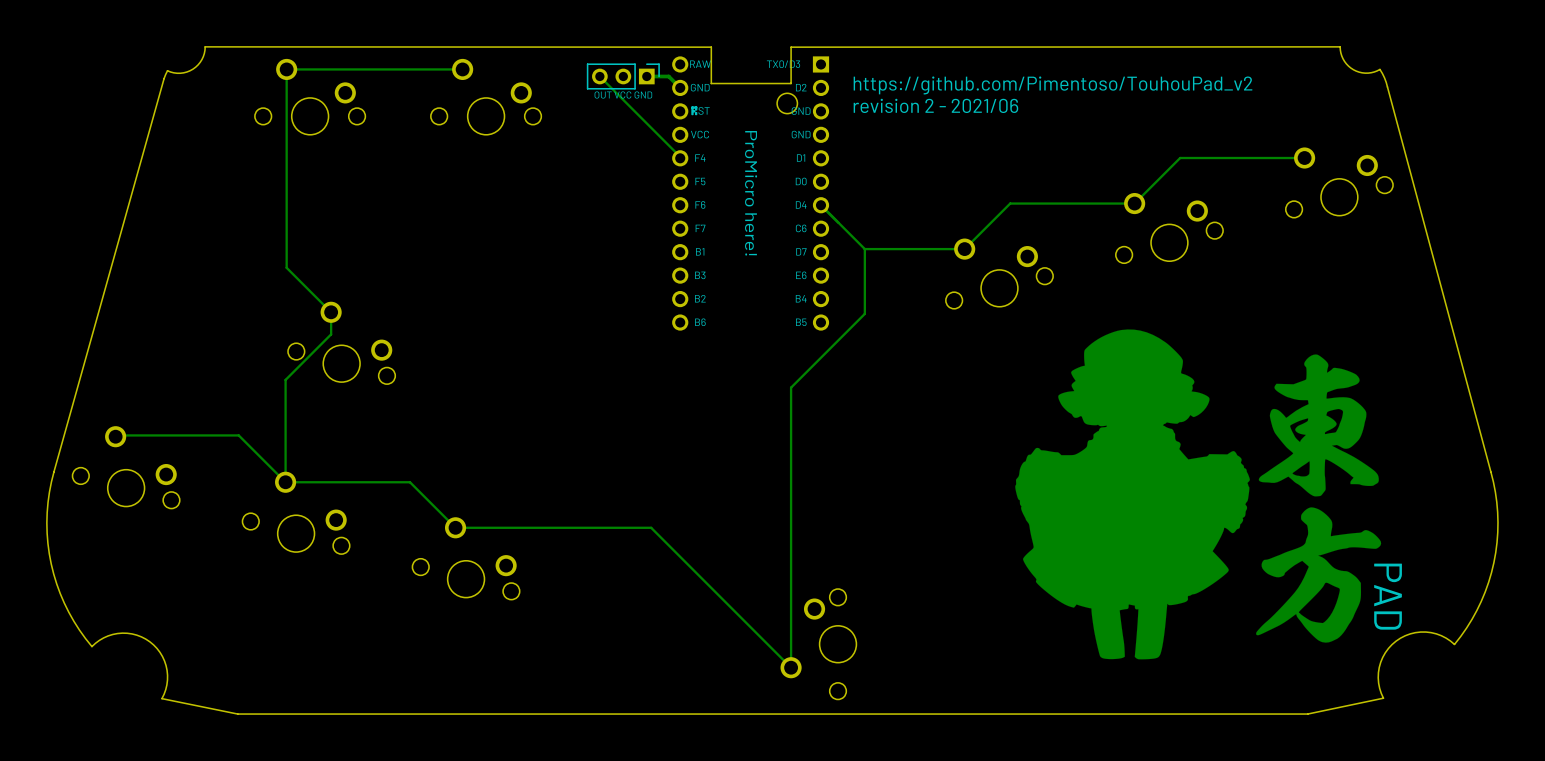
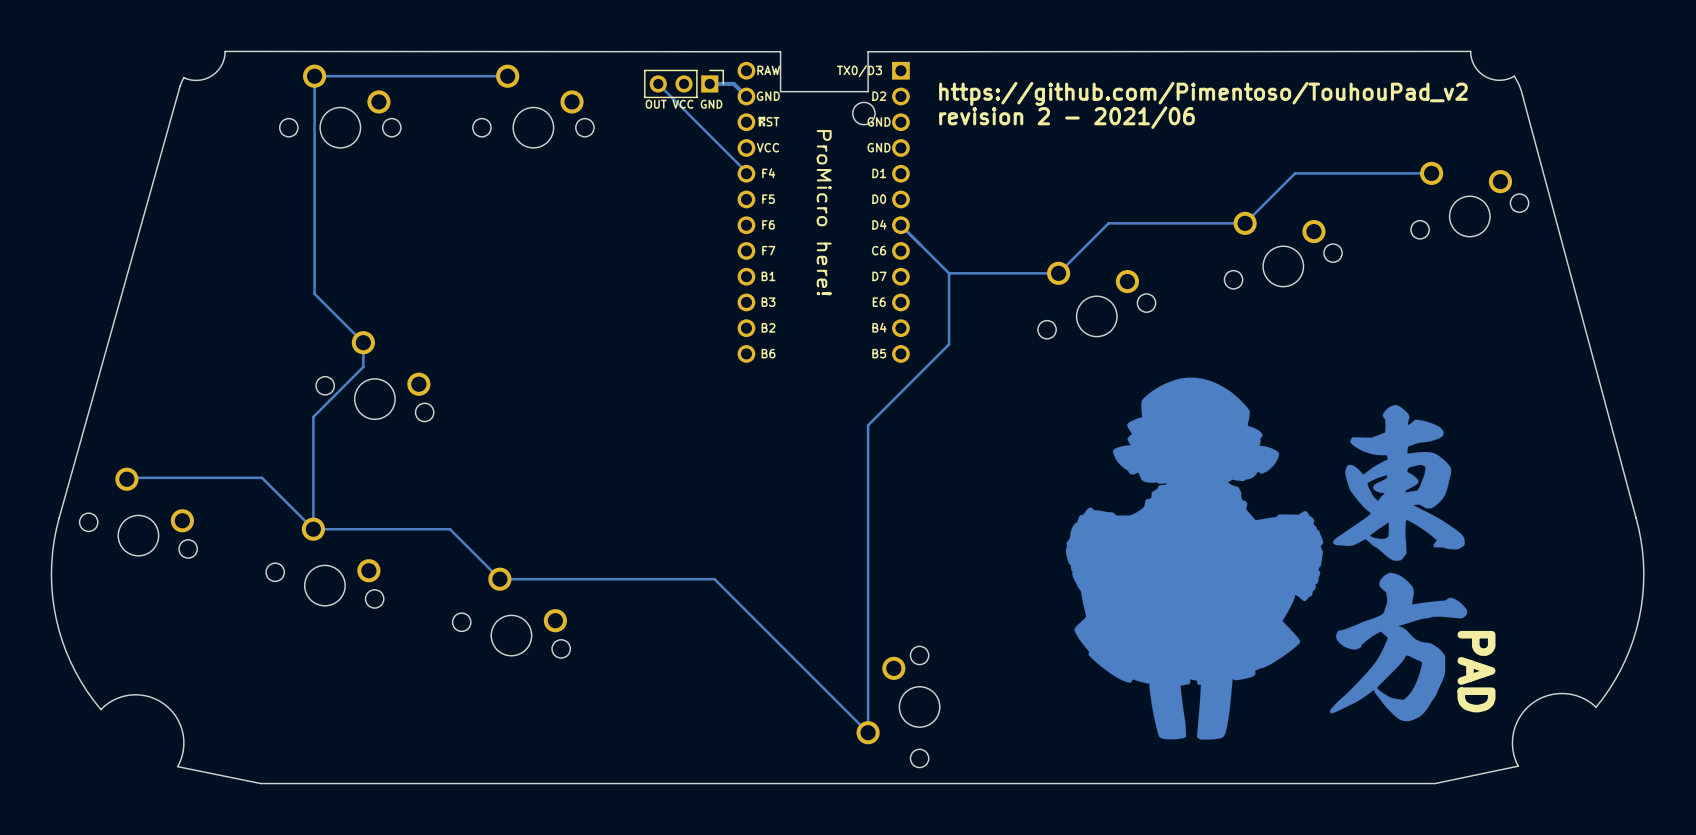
drawing position: (1198, 494) -> (1266, 558)
text position: PAD (1388, 596) -> PAD (1476, 671)

